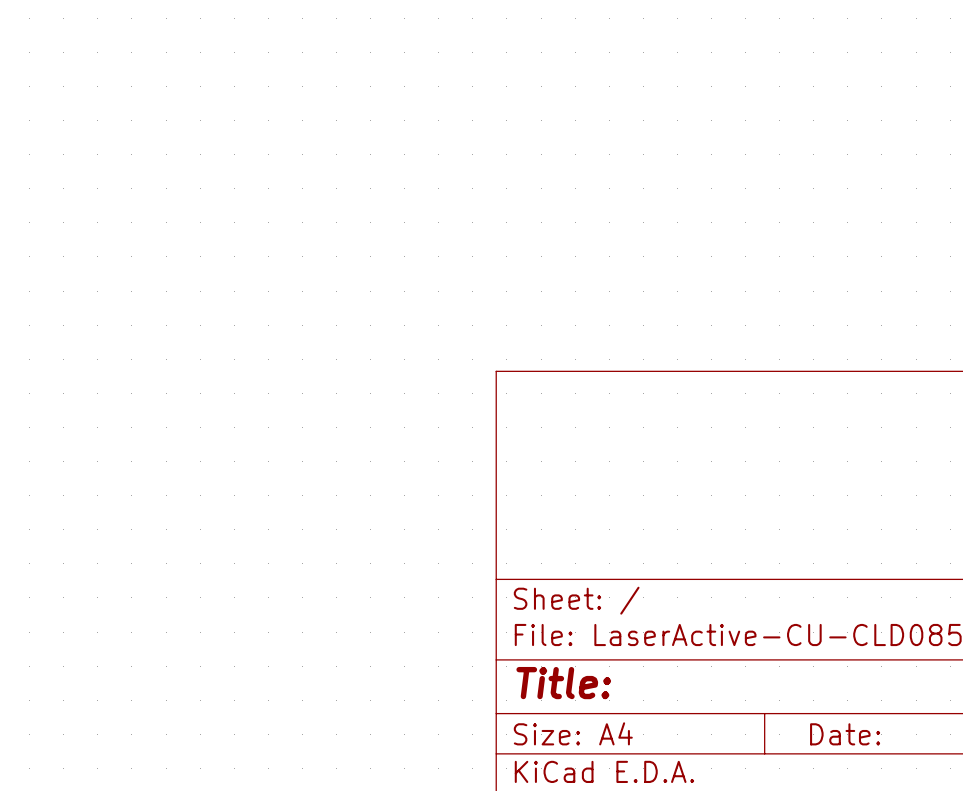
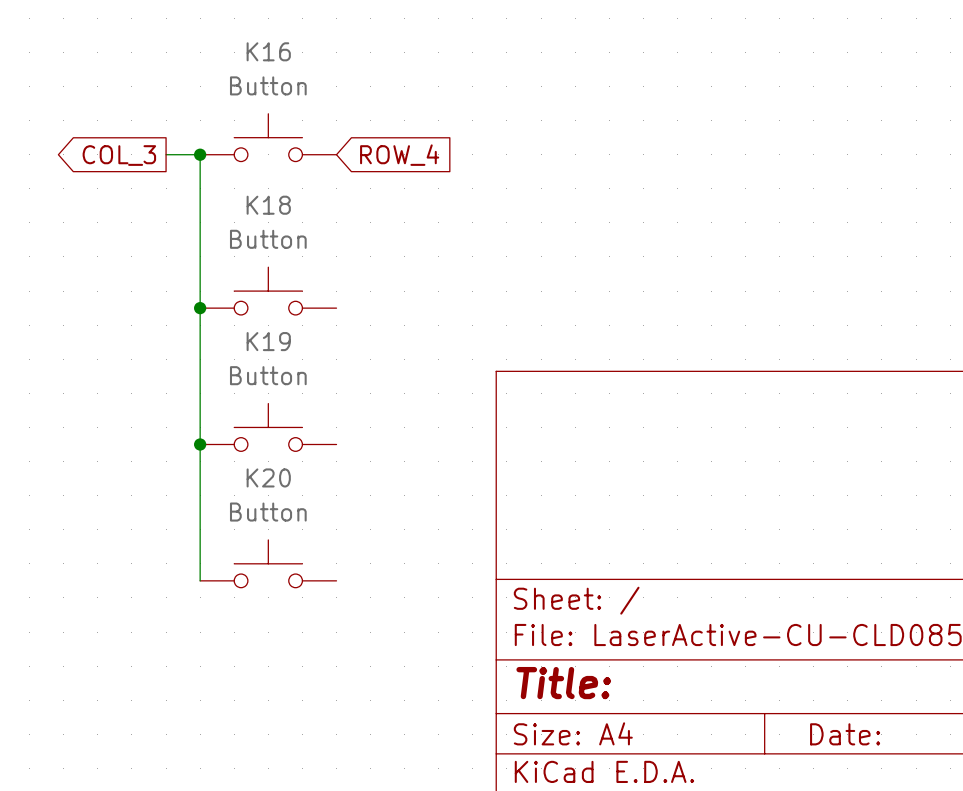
K16: none -> Button (268, 137)
wire: none -> (166, 154) (200, 154) (200, 580)
junction: none -> (200, 154)
global label: none -> COL_3 (119, 155)
global label: none -> ROW_4 (399, 155)
K18: none -> Button (268, 291)
junction: none -> (200, 308)
K19: none -> Button (268, 427)
junction: none -> (200, 444)
K20: none -> Button (268, 563)

